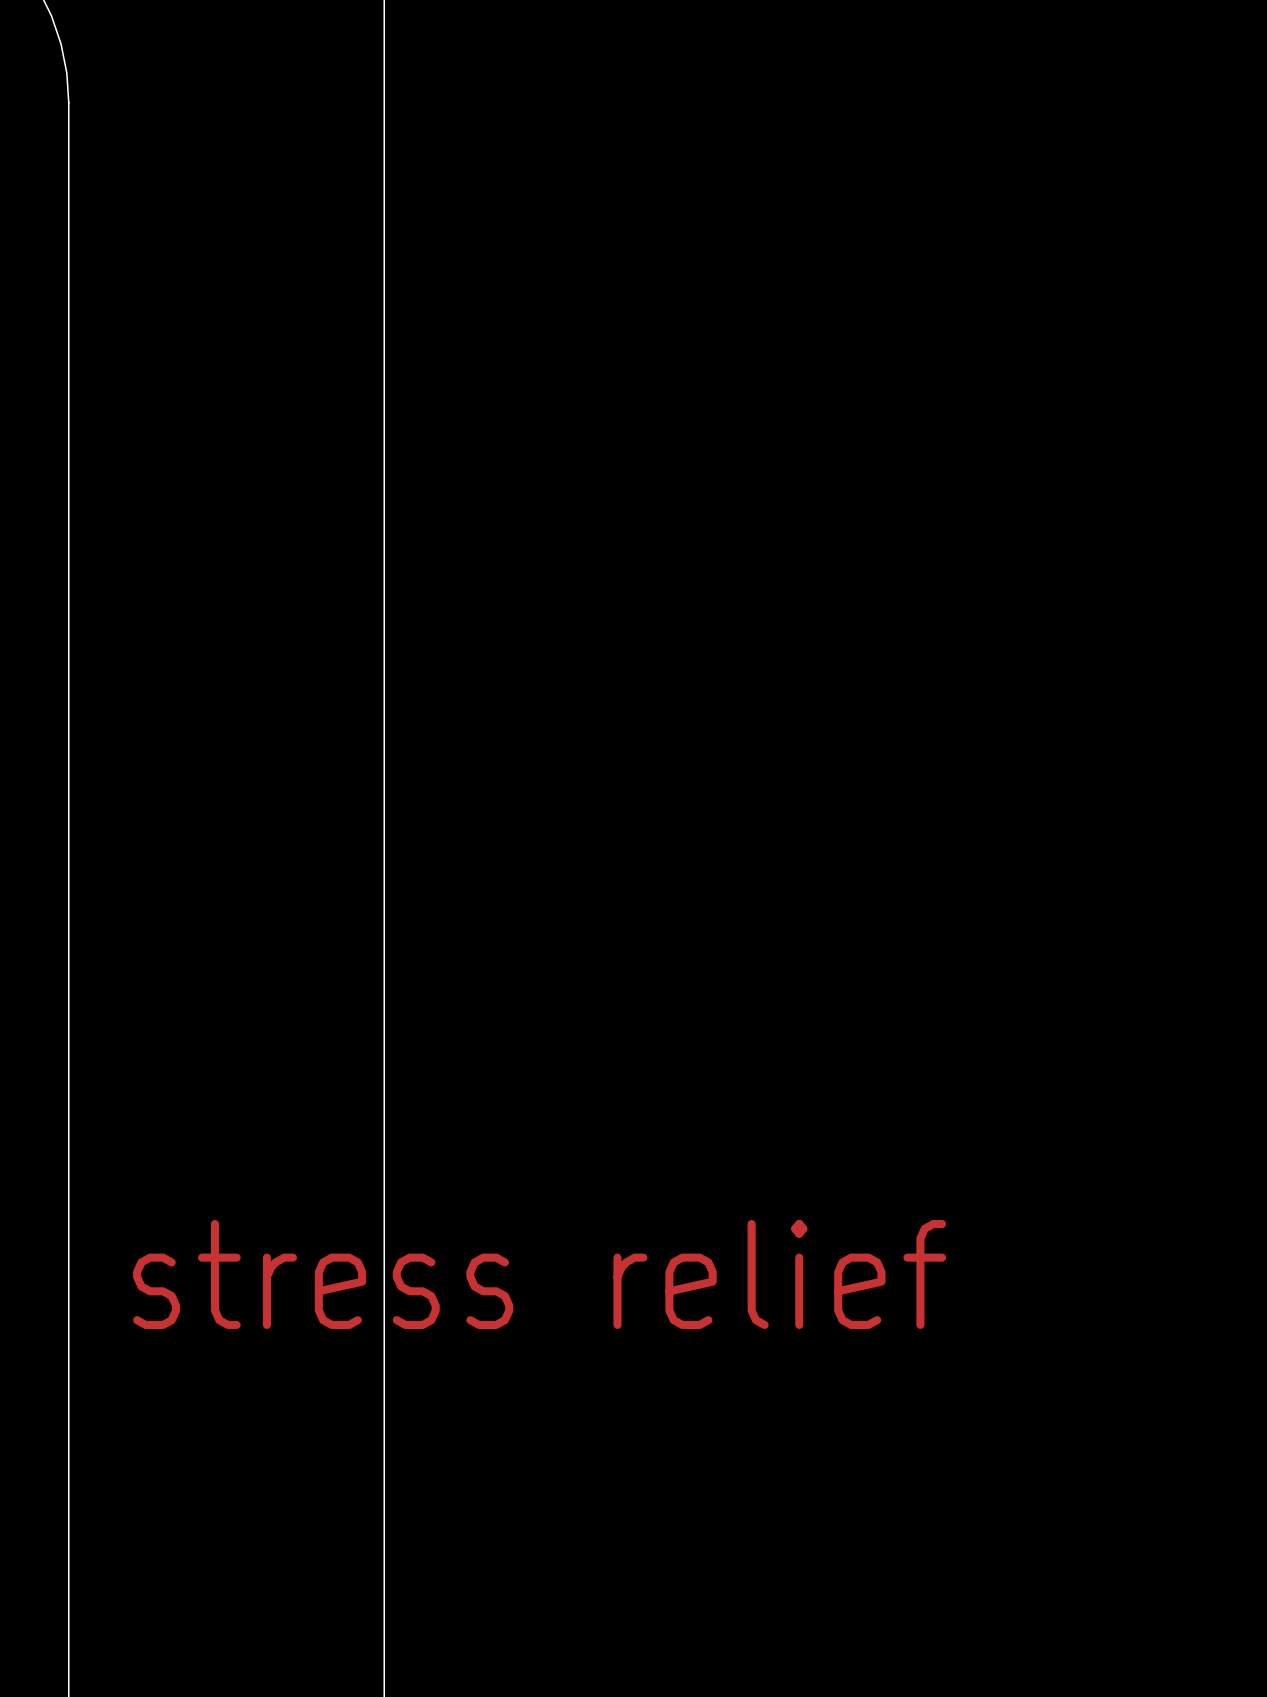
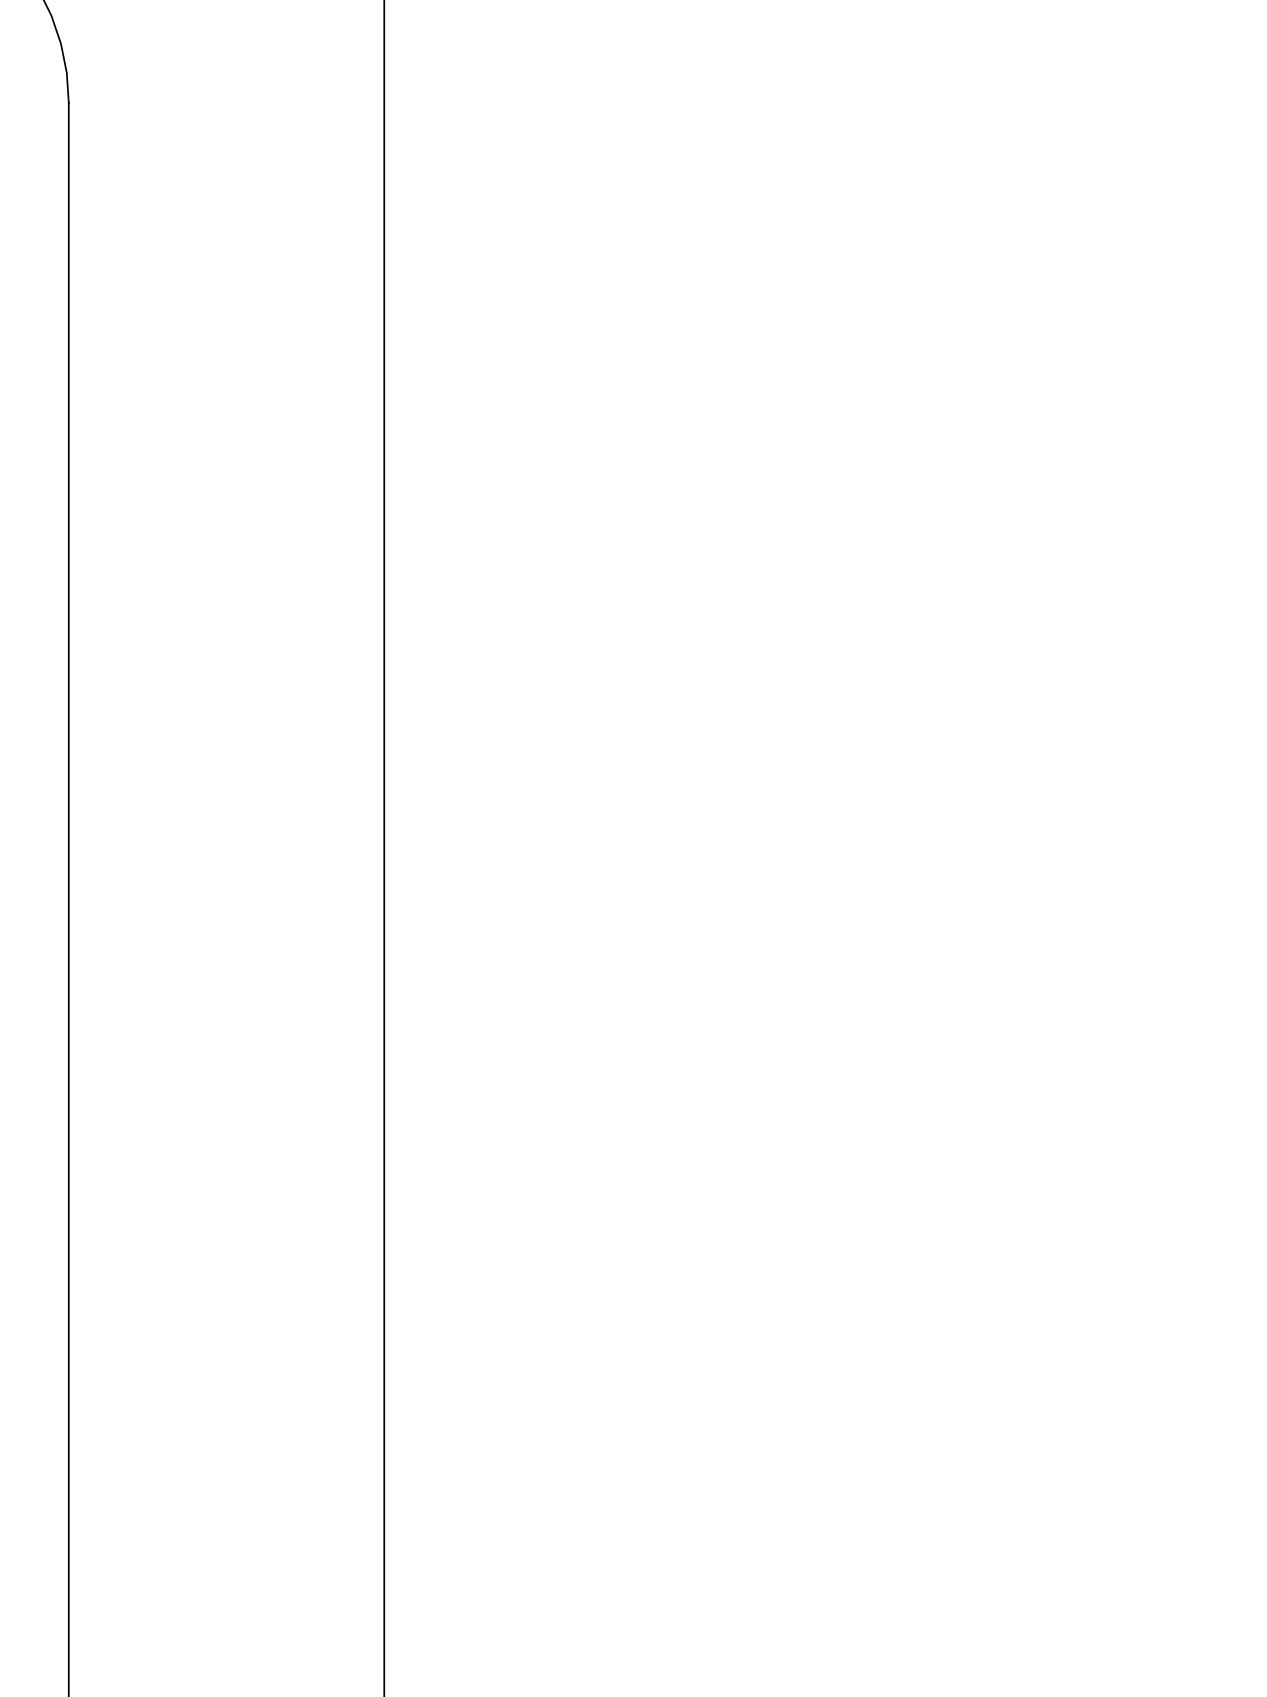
text: stress relief (539, 1274) -> none

